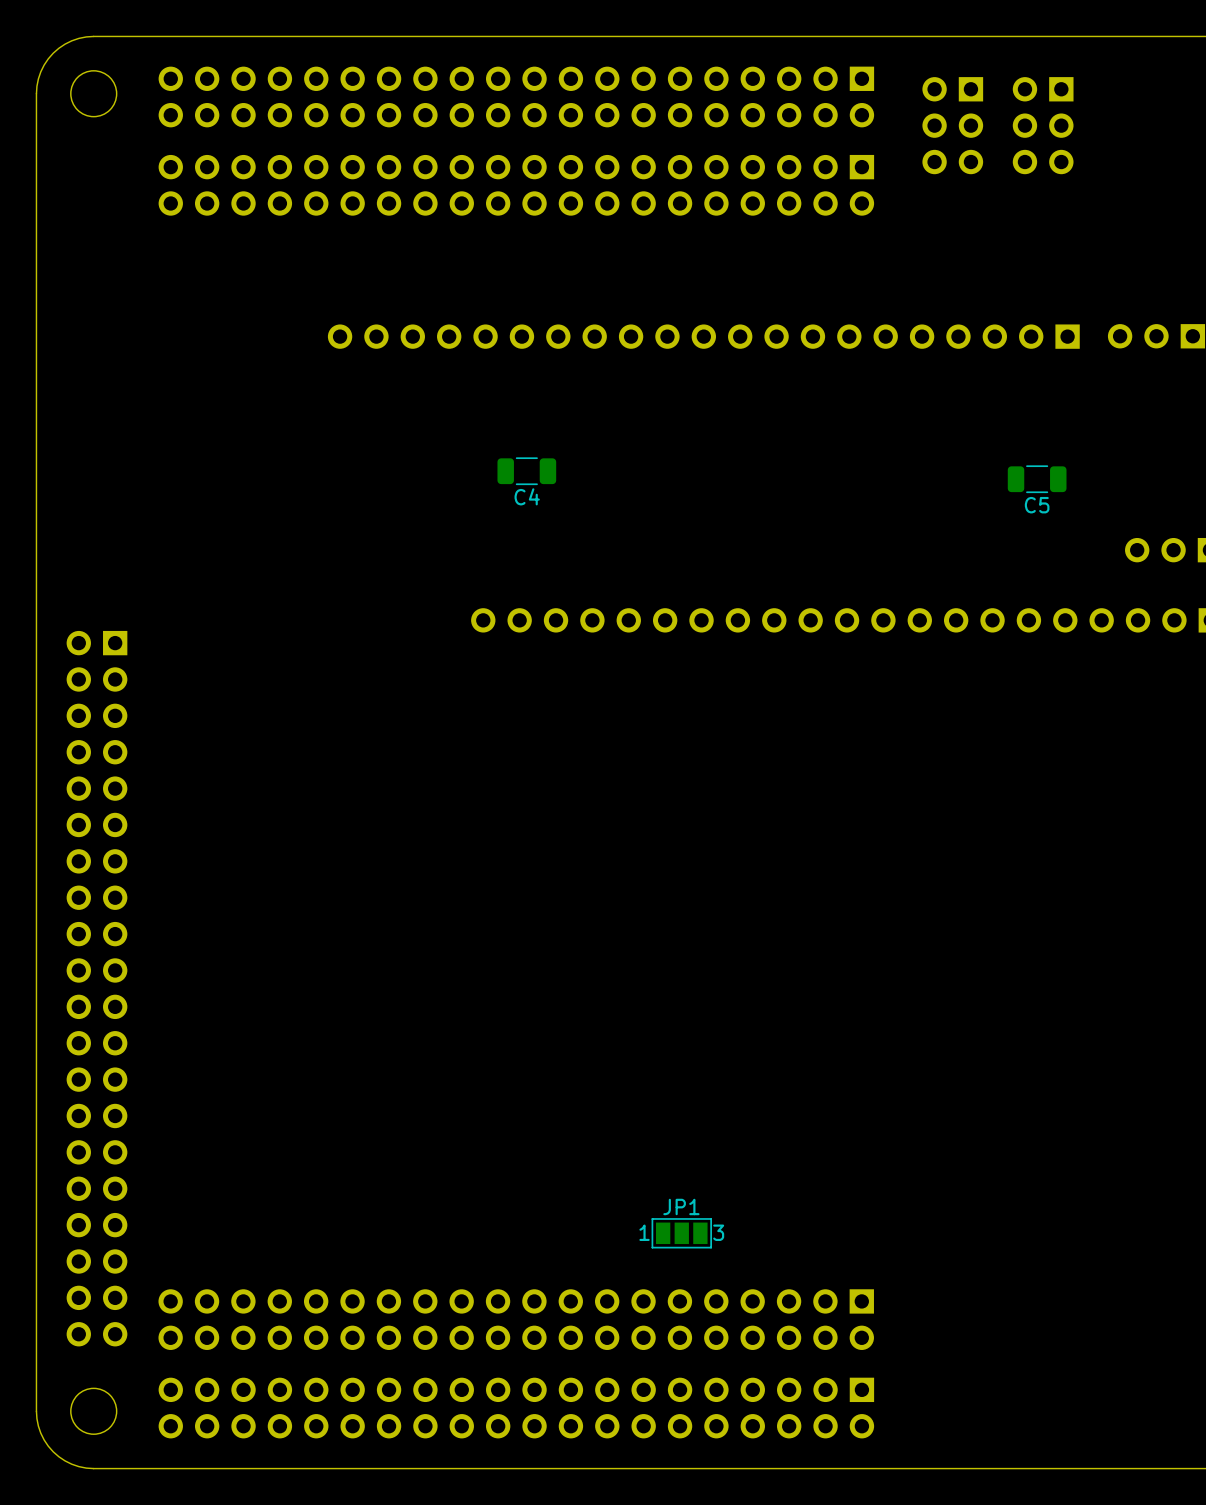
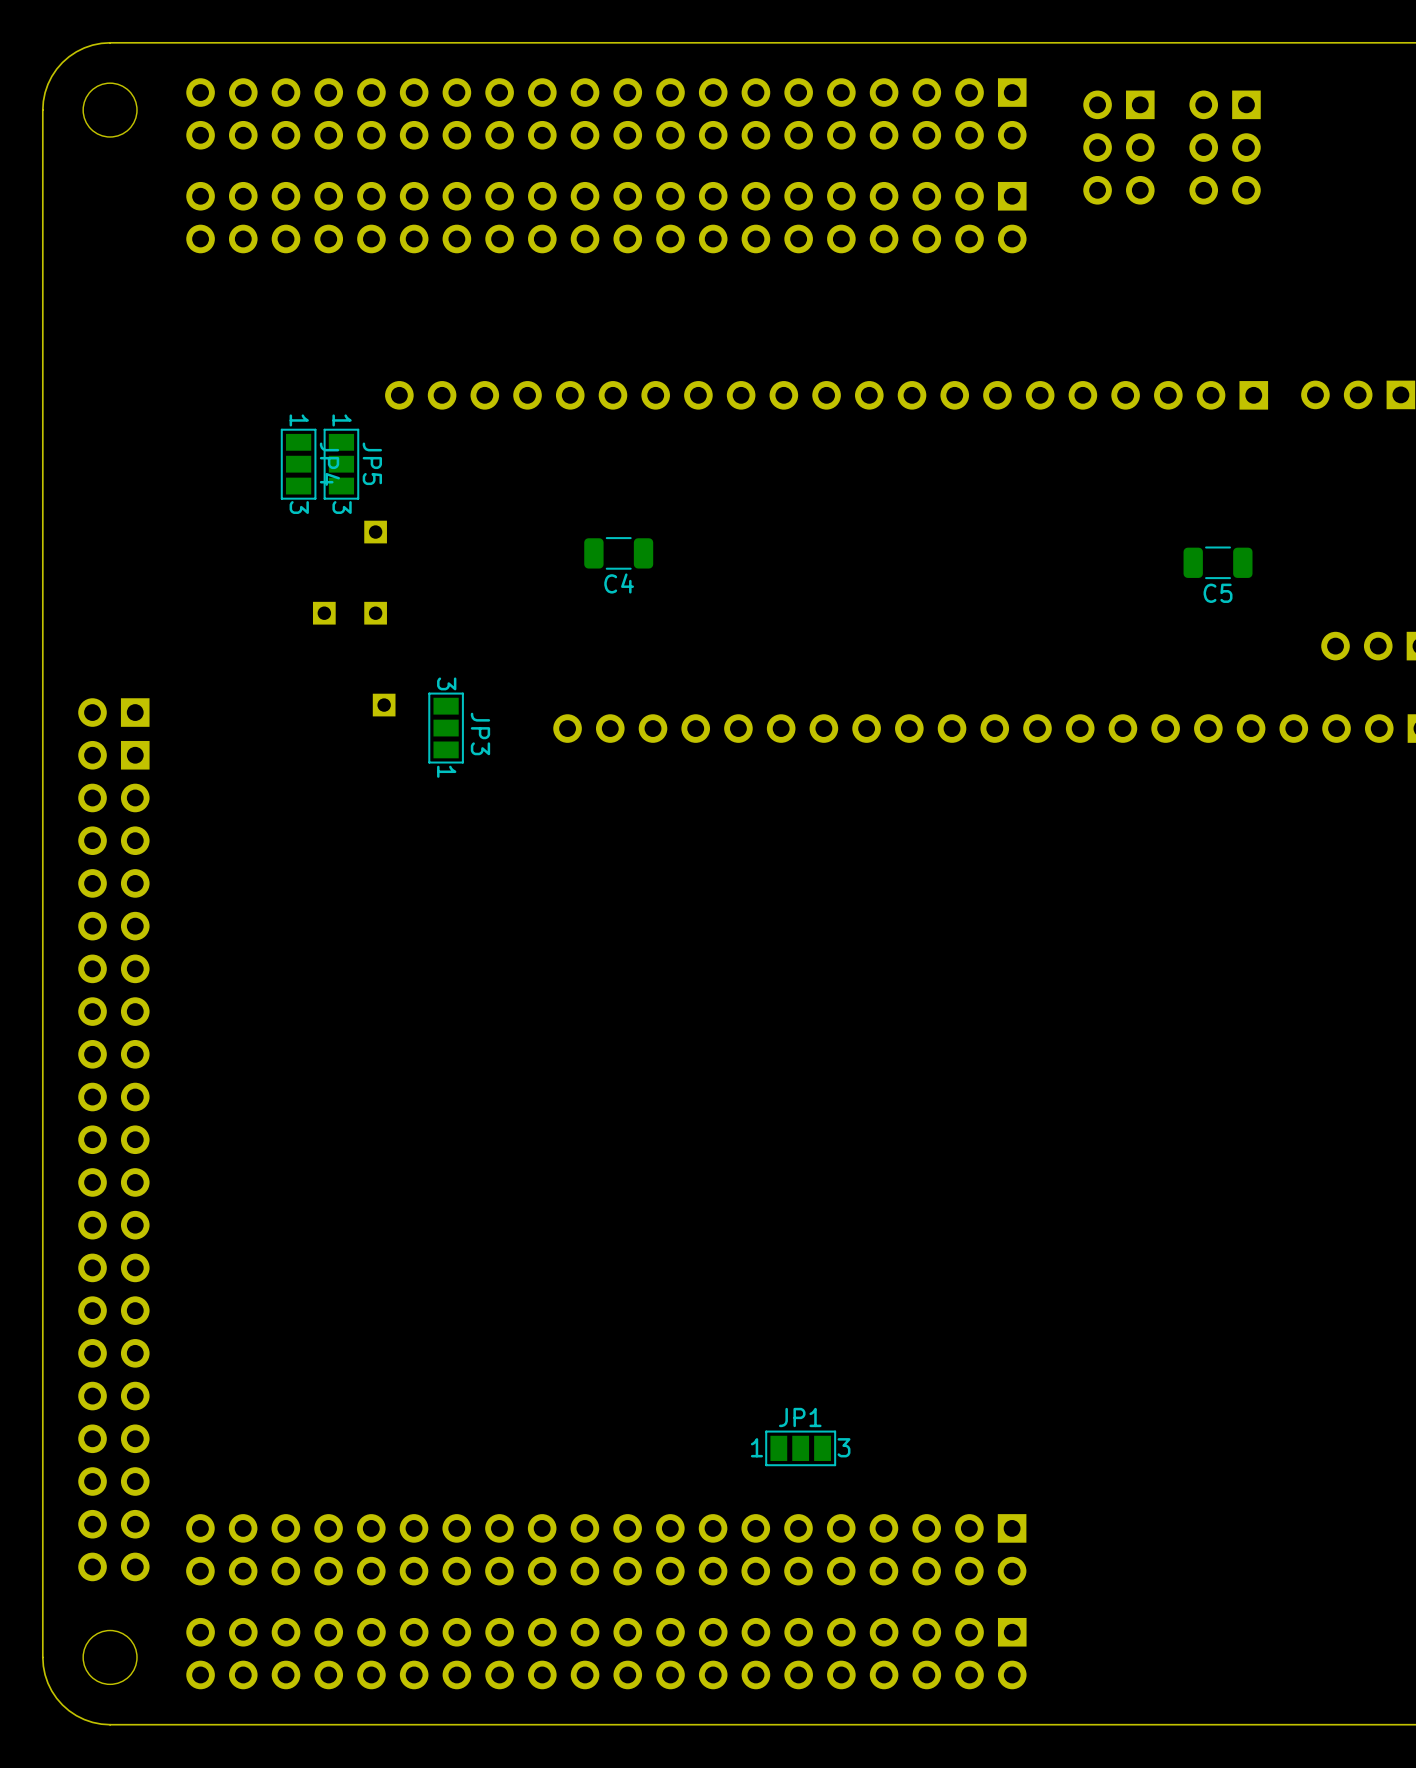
JP4: none -> (298, 464)
JP5: none -> (341, 464)
part: none -> (375, 532)
part: none -> (324, 613)
part: none -> (375, 613)
part: none -> (384, 705)
part: none -> (113, 712)
JP3: none -> (446, 728)

